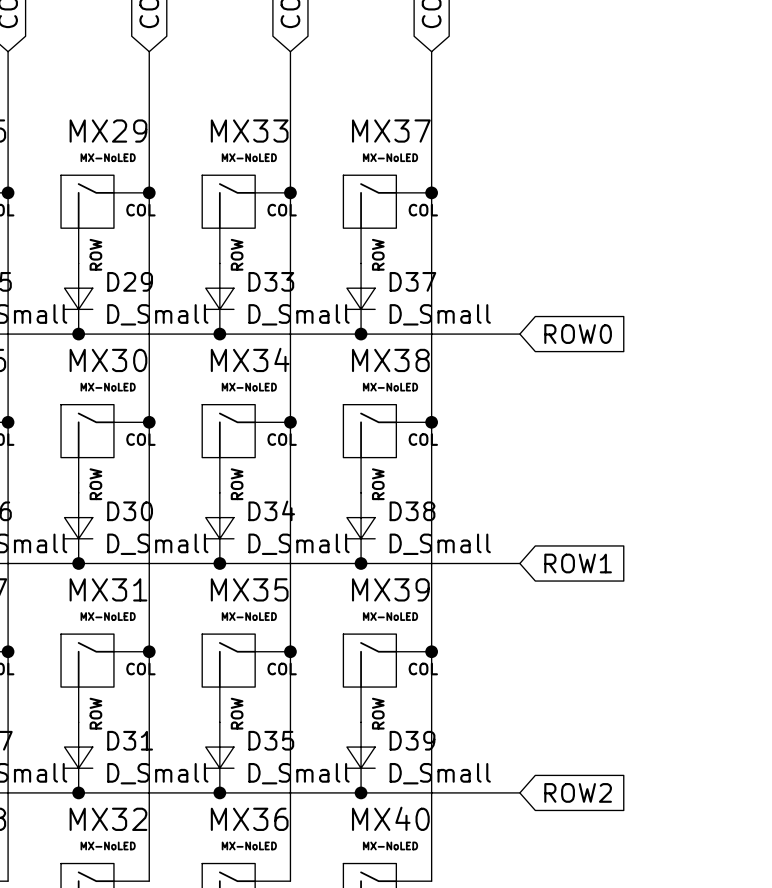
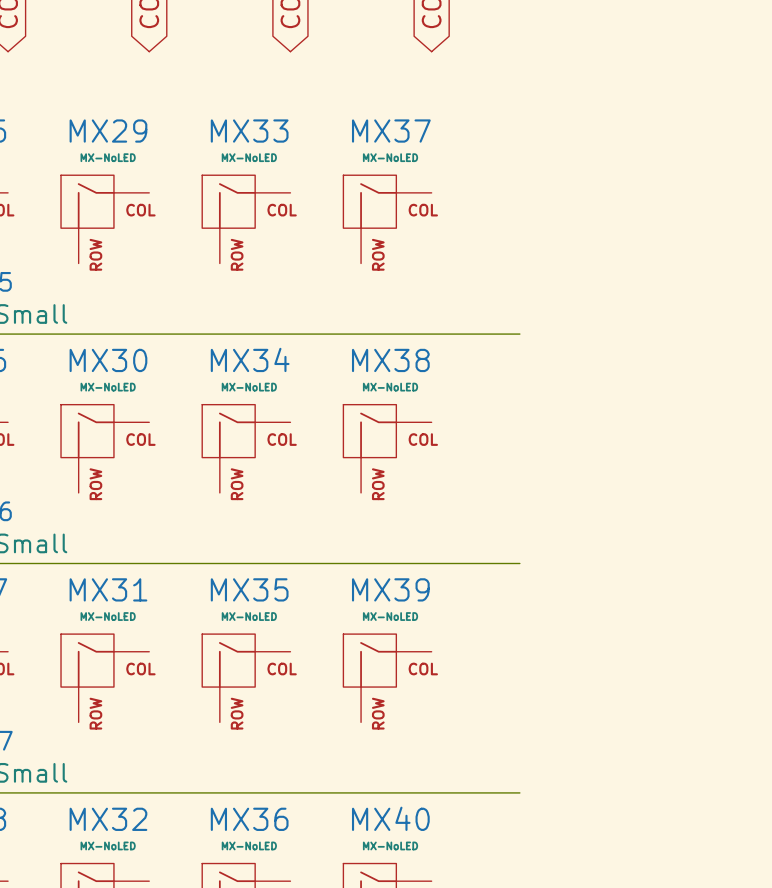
wire: (8, 51) (8, 881) -> none
wire: (149, 51) (149, 881) -> none
wire: (290, 51) (290, 881) -> none
wire: (431, 51) (431, 881) -> none
junction: (8, 192) -> none
junction: (149, 192) -> none
junction: (290, 192) -> none
junction: (431, 192) -> none
D29: D_Small (78, 298) -> none
D33: D_Small (219, 298) -> none
D37: D_Small (361, 298) -> none
junction: (78, 334) -> none
junction: (219, 334) -> none
junction: (361, 334) -> none
global label: ROW0 (578, 334) -> none
junction: (8, 422) -> none
junction: (149, 422) -> none
junction: (290, 422) -> none
junction: (431, 422) -> none
D30: D_Small (78, 528) -> none
D34: D_Small (219, 528) -> none
D38: D_Small (361, 528) -> none
junction: (78, 563) -> none
junction: (219, 563) -> none
junction: (361, 563) -> none
global label: ROW1 (578, 563) -> none
junction: (8, 651) -> none
junction: (149, 651) -> none
junction: (290, 651) -> none
junction: (431, 651) -> none
D31: D_Small (78, 757) -> none
D35: D_Small (219, 757) -> none
D39: D_Small (361, 757) -> none
junction: (78, 792) -> none
junction: (219, 792) -> none
junction: (361, 792) -> none
global label: ROW2 (578, 792) -> none

